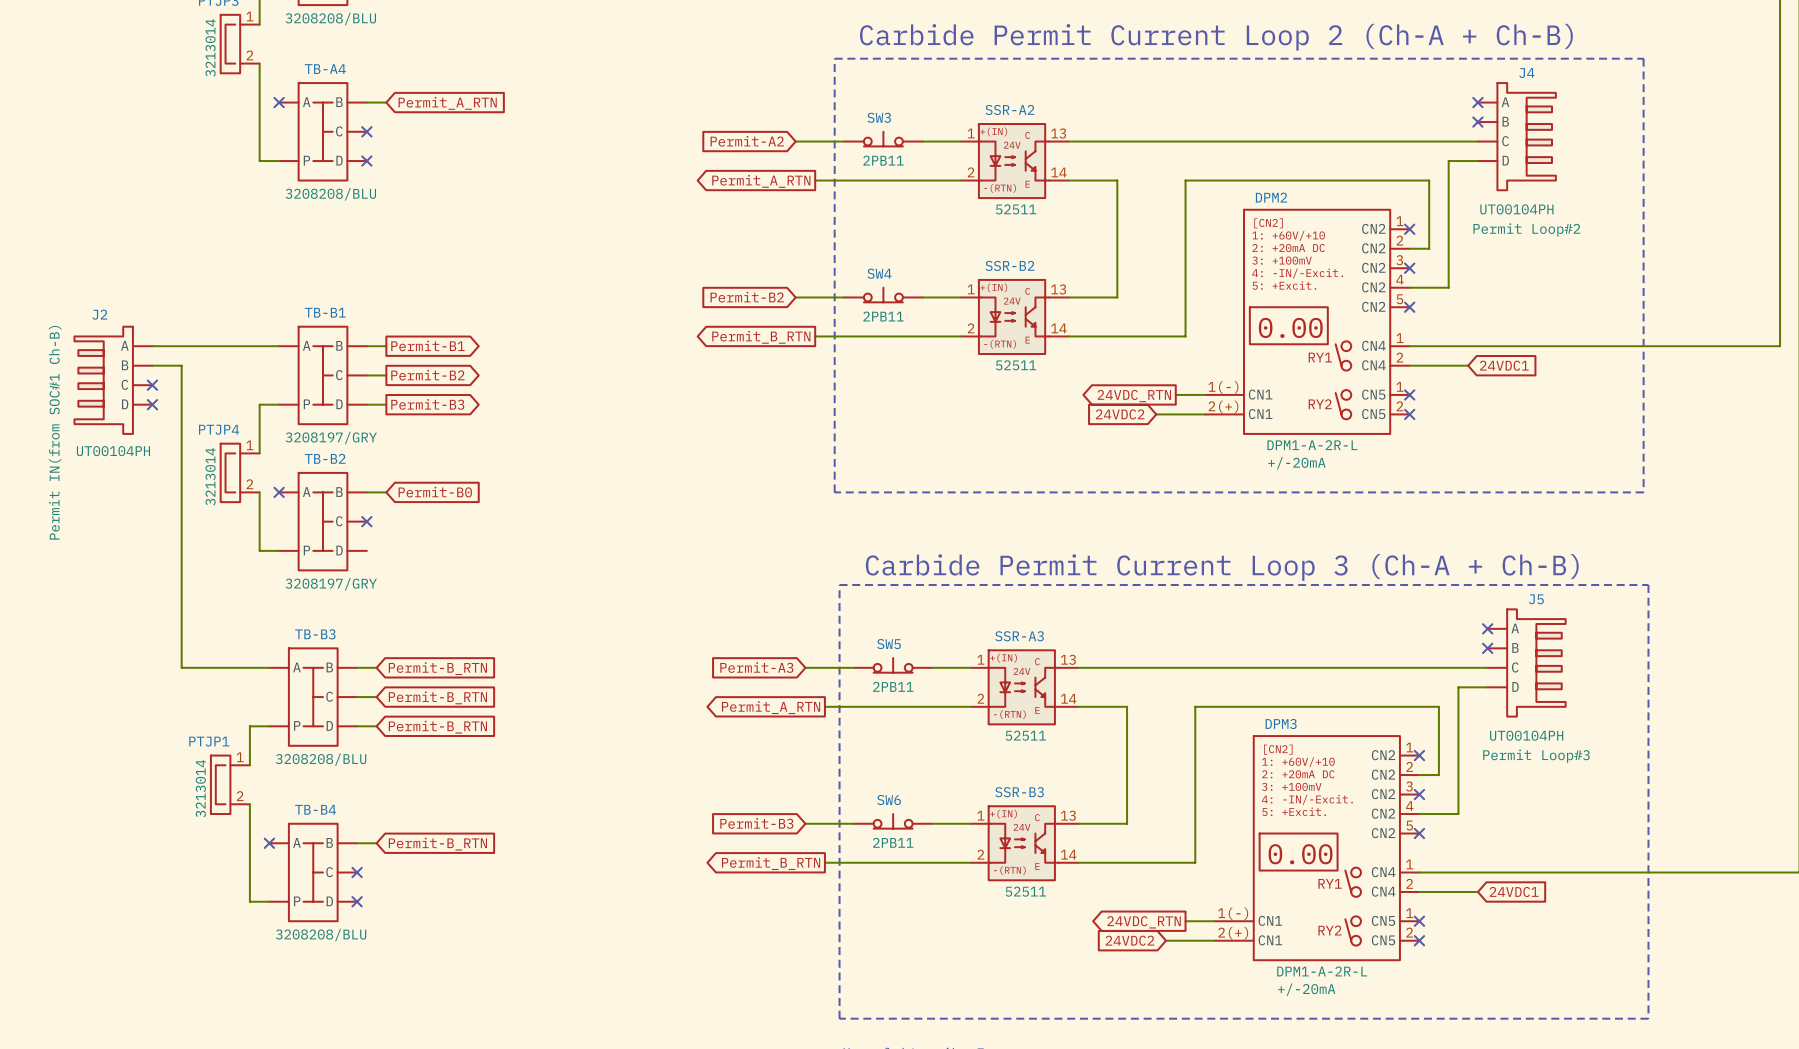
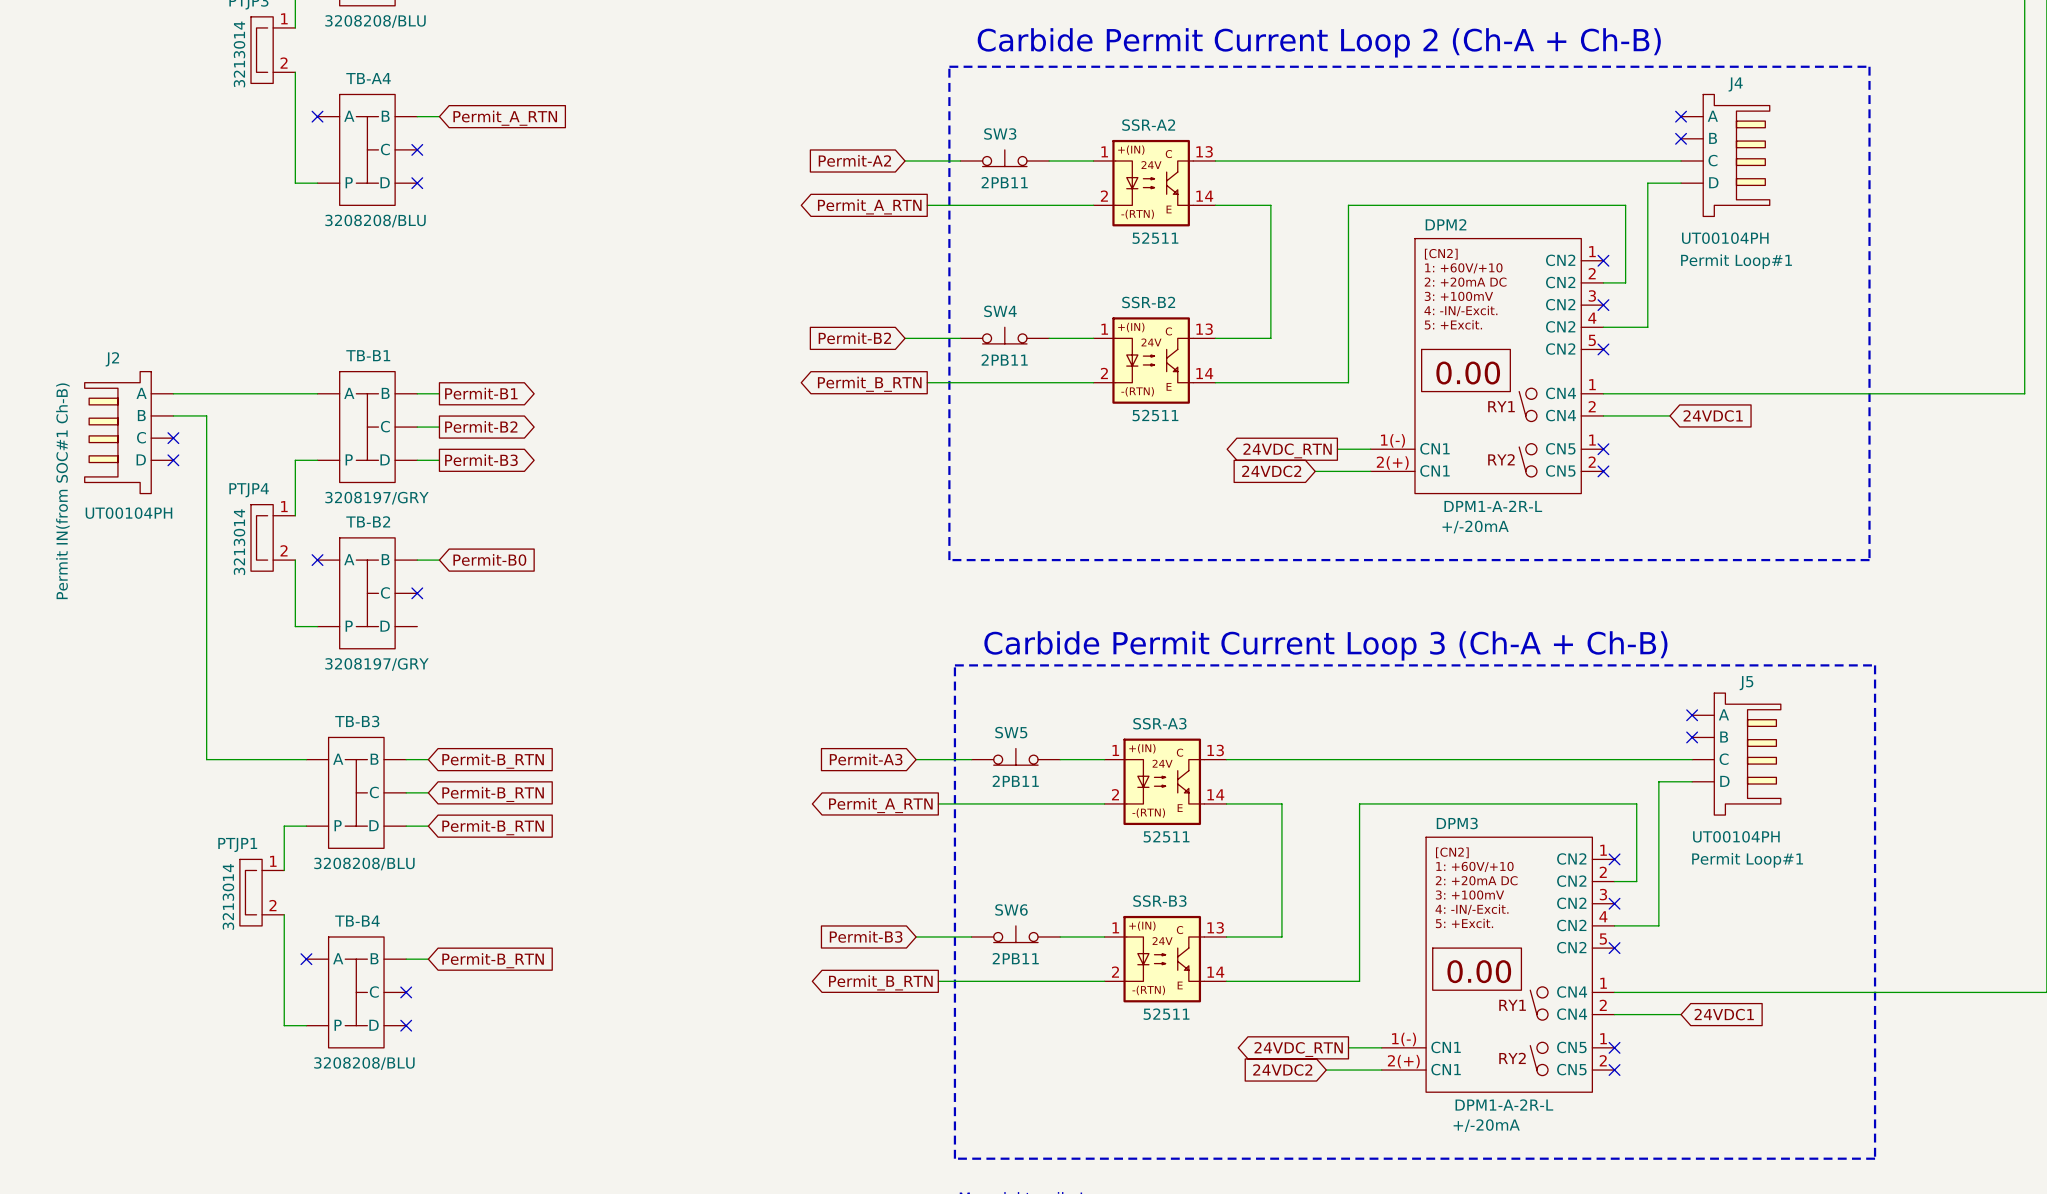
J4 text: Permit Loop#2 (1526, 229) -> Permit Loop#1 (1736, 261)
J5 text: Permit Loop#3 (1536, 756) -> Permit Loop#1 (1747, 860)

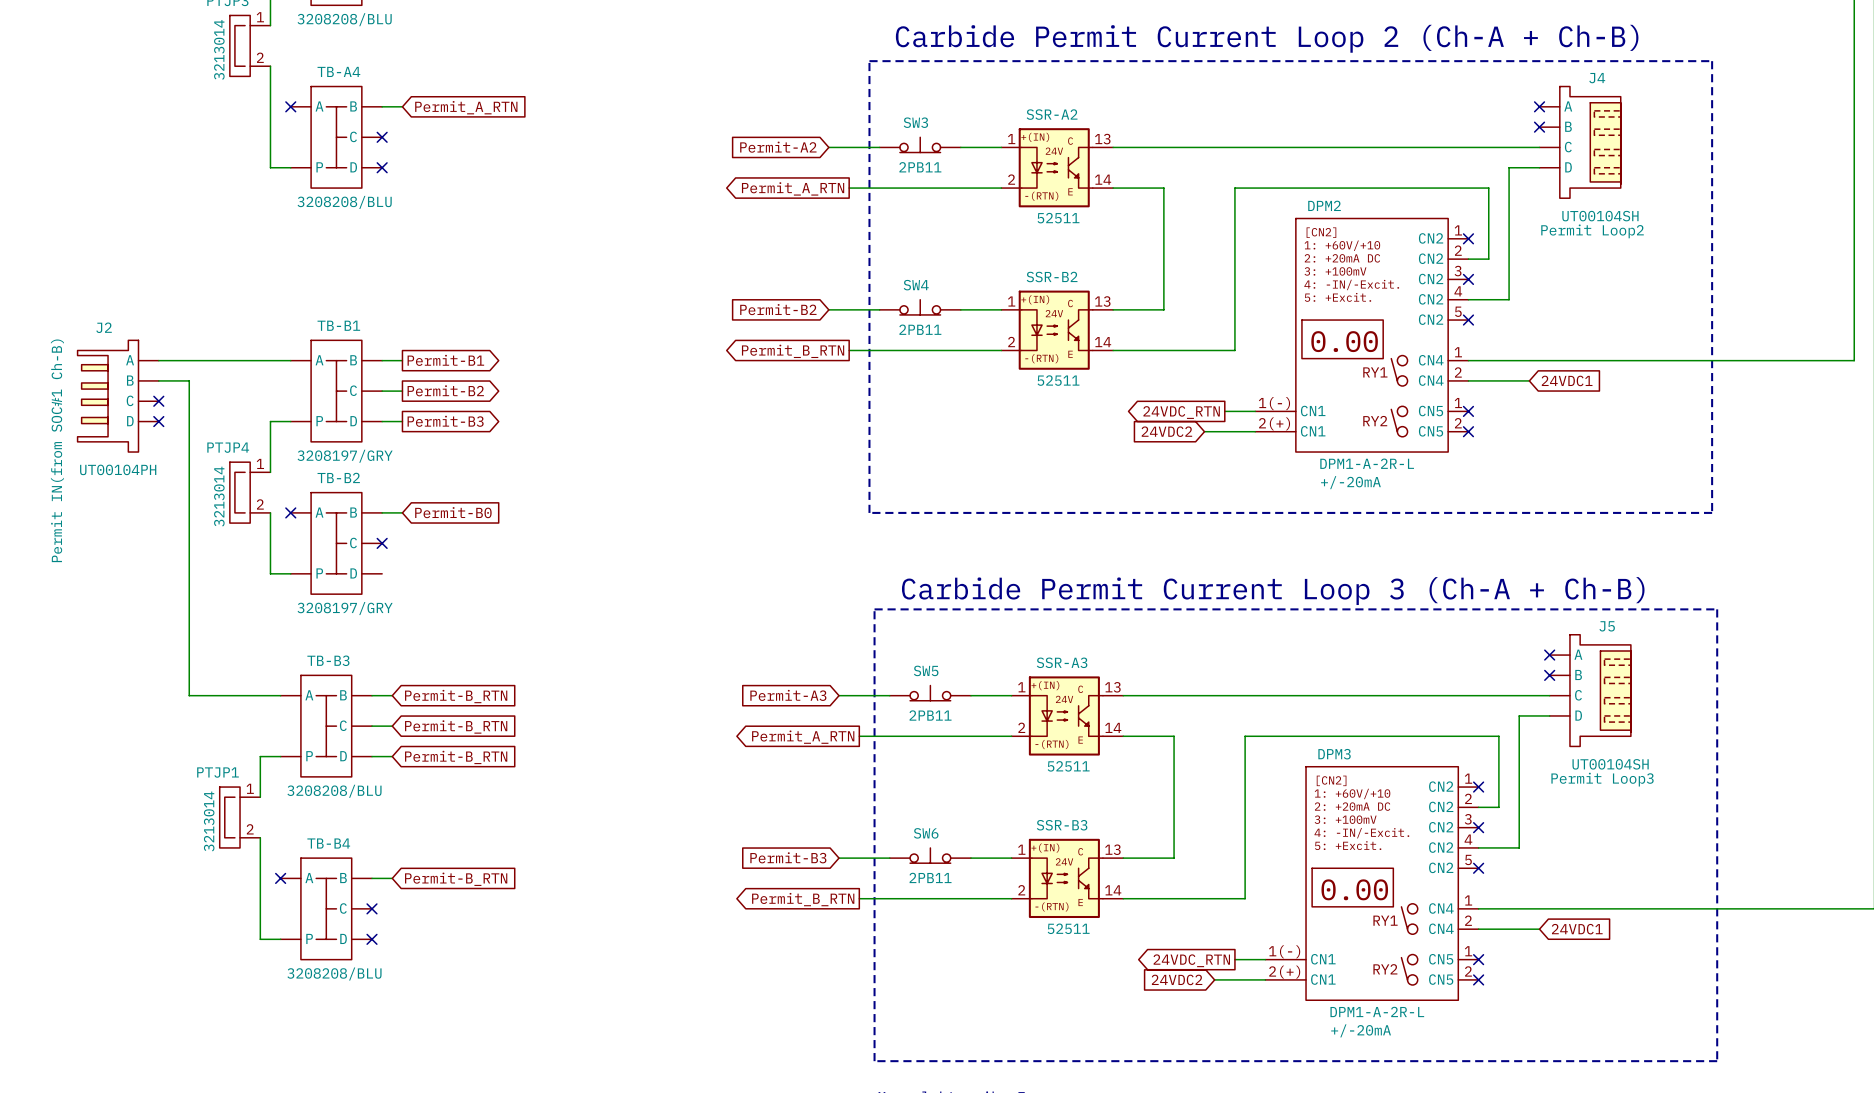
J4 symbol: [1681, 94, 1770, 217] -> [1539, 86, 1621, 199]
J4 value: UT00104PH (1725, 238) -> UT00104SH (1600, 216)
J4 text: Permit Loop#1 (1736, 261) -> Permit Loop2 (1592, 231)
J5 symbol: [1692, 693, 1781, 816] -> [1549, 634, 1631, 747]
J5 value: UT00104PH (1736, 836) -> UT00104SH (1610, 764)
J5 text: Permit Loop#1 (1747, 860) -> Permit Loop3 (1602, 779)

